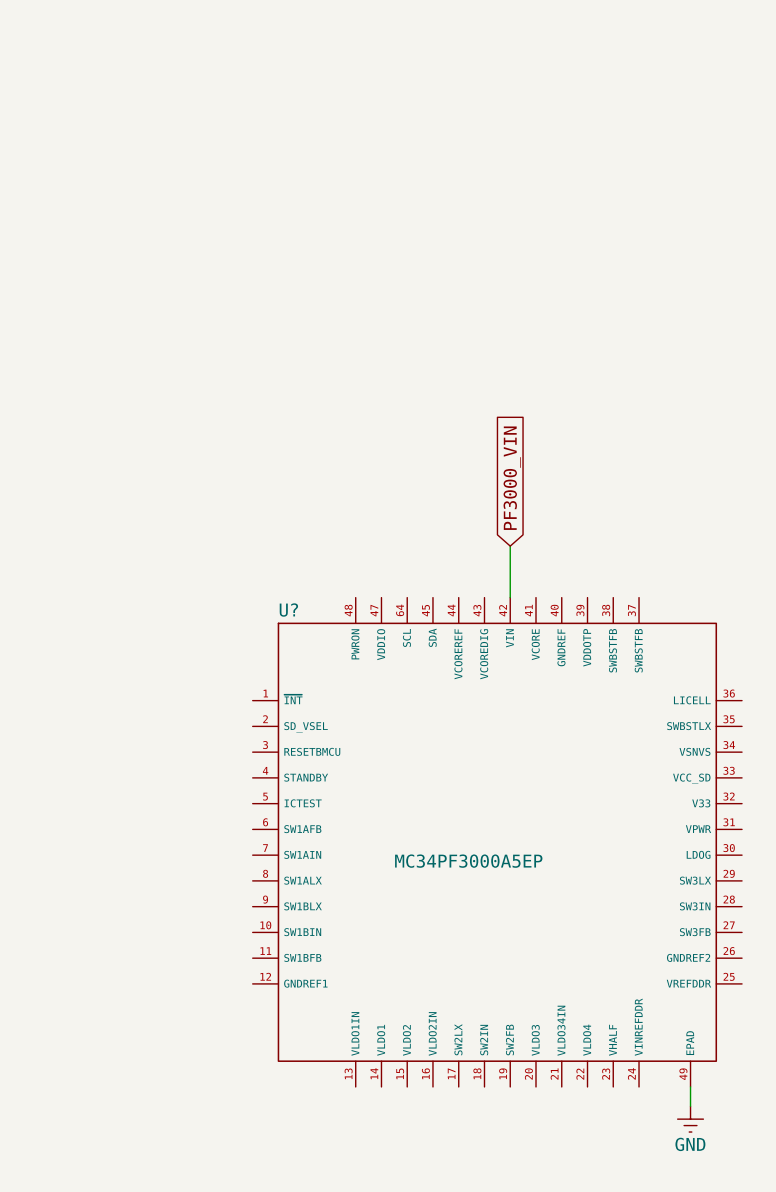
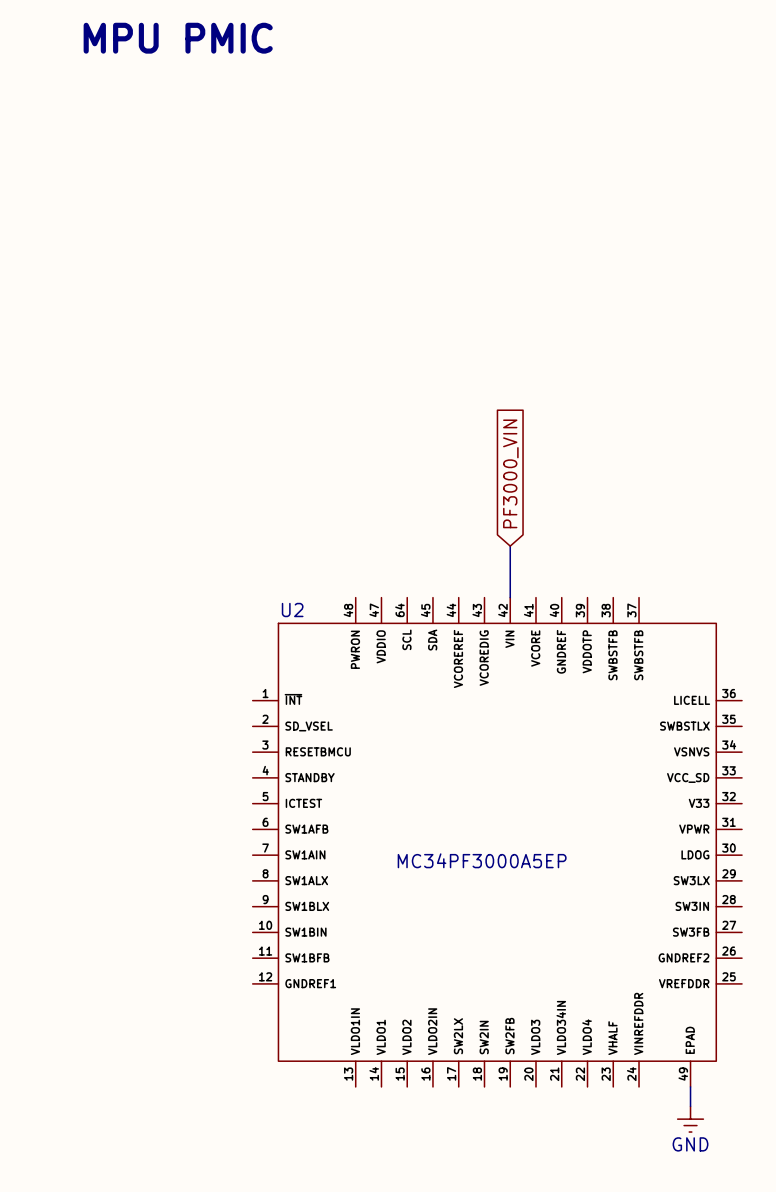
text: none -> MPU PMIC (178, 38)
U? name: U? (288, 610) -> U2 (292, 610)

